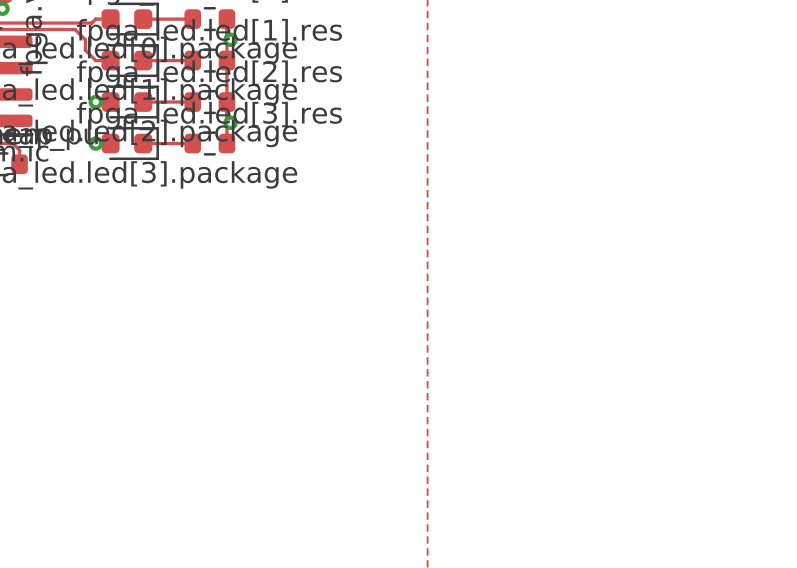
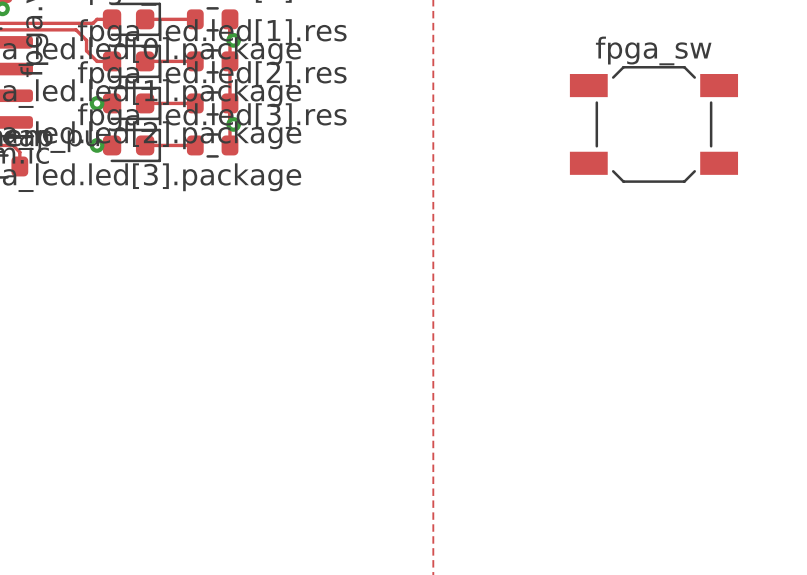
fpga_sw: none -> (653, 124)

